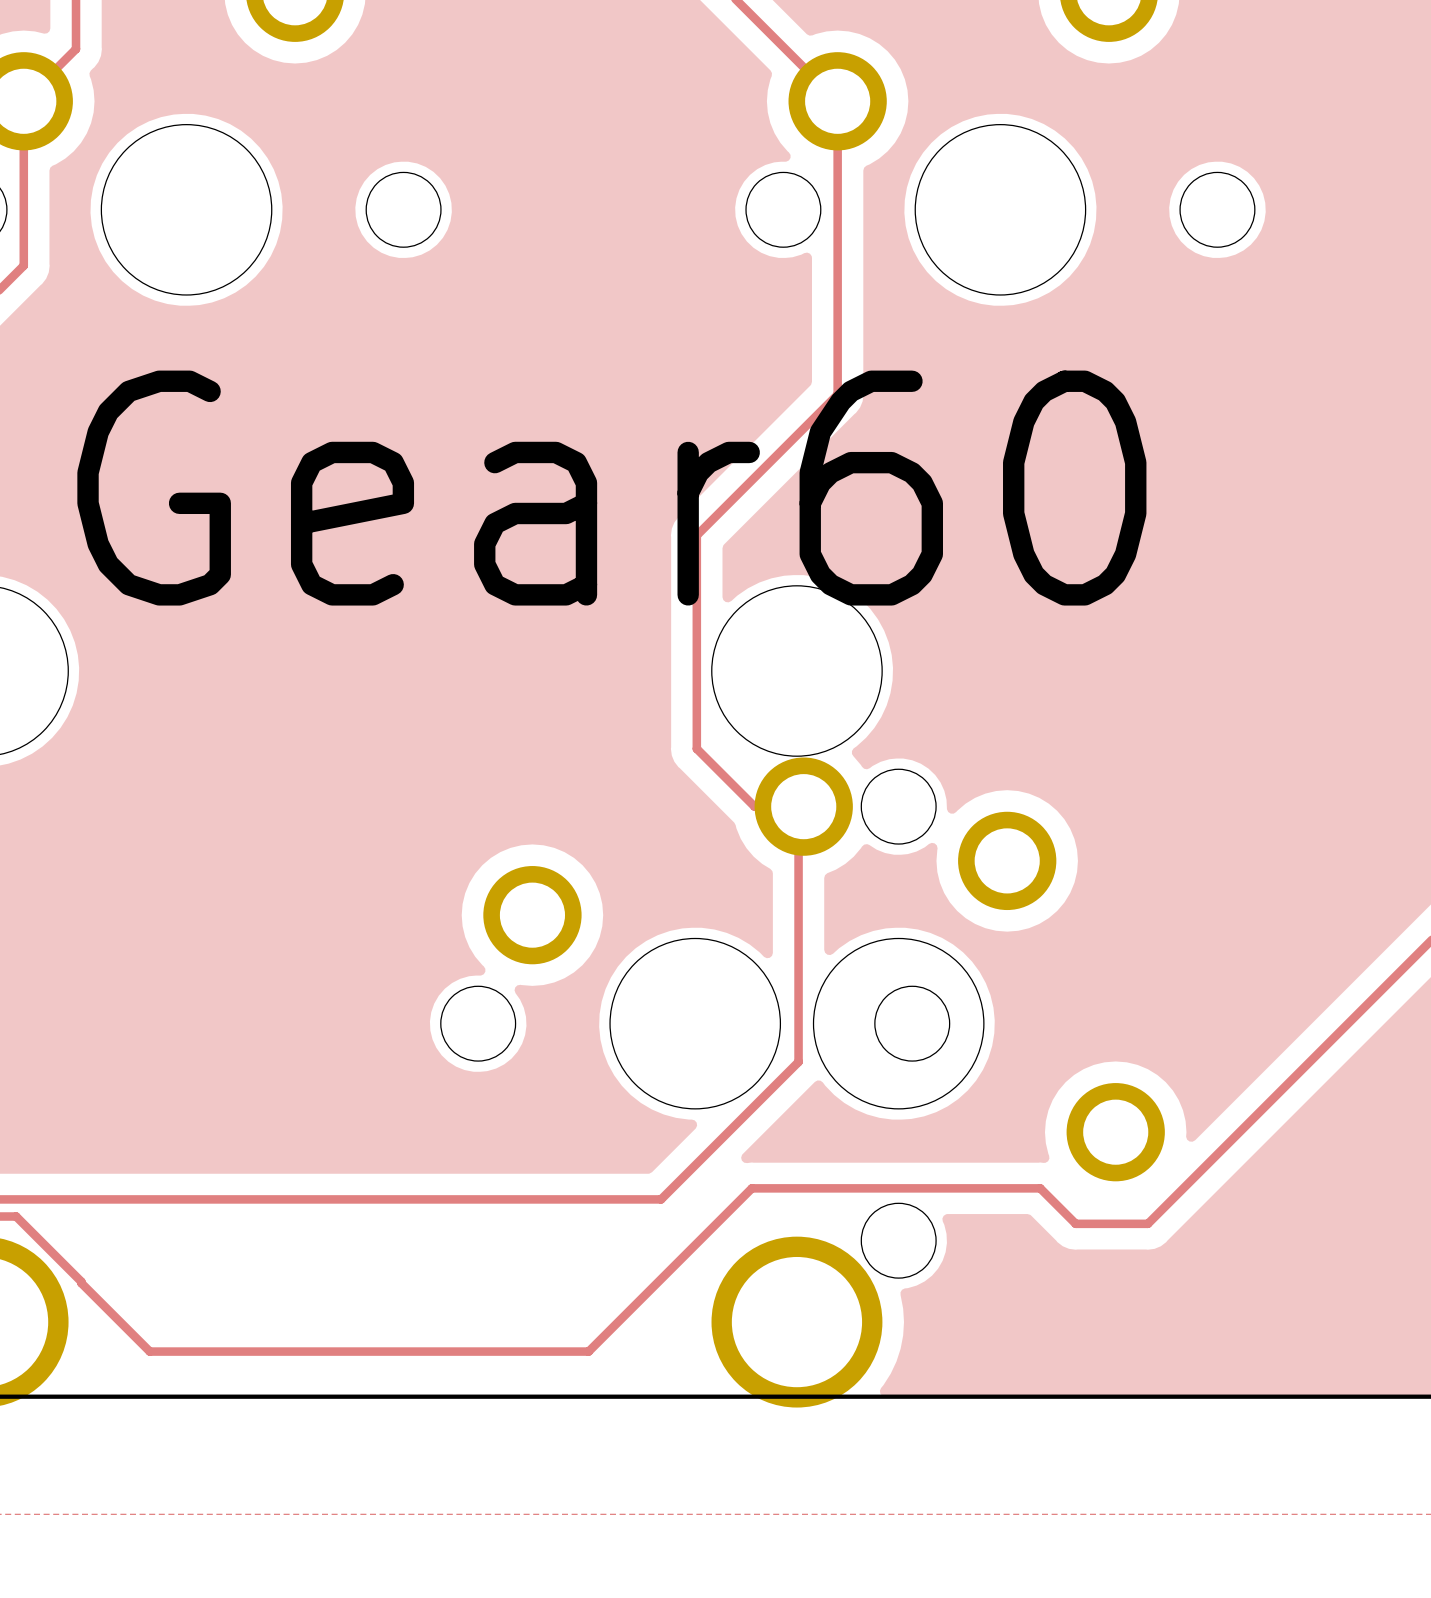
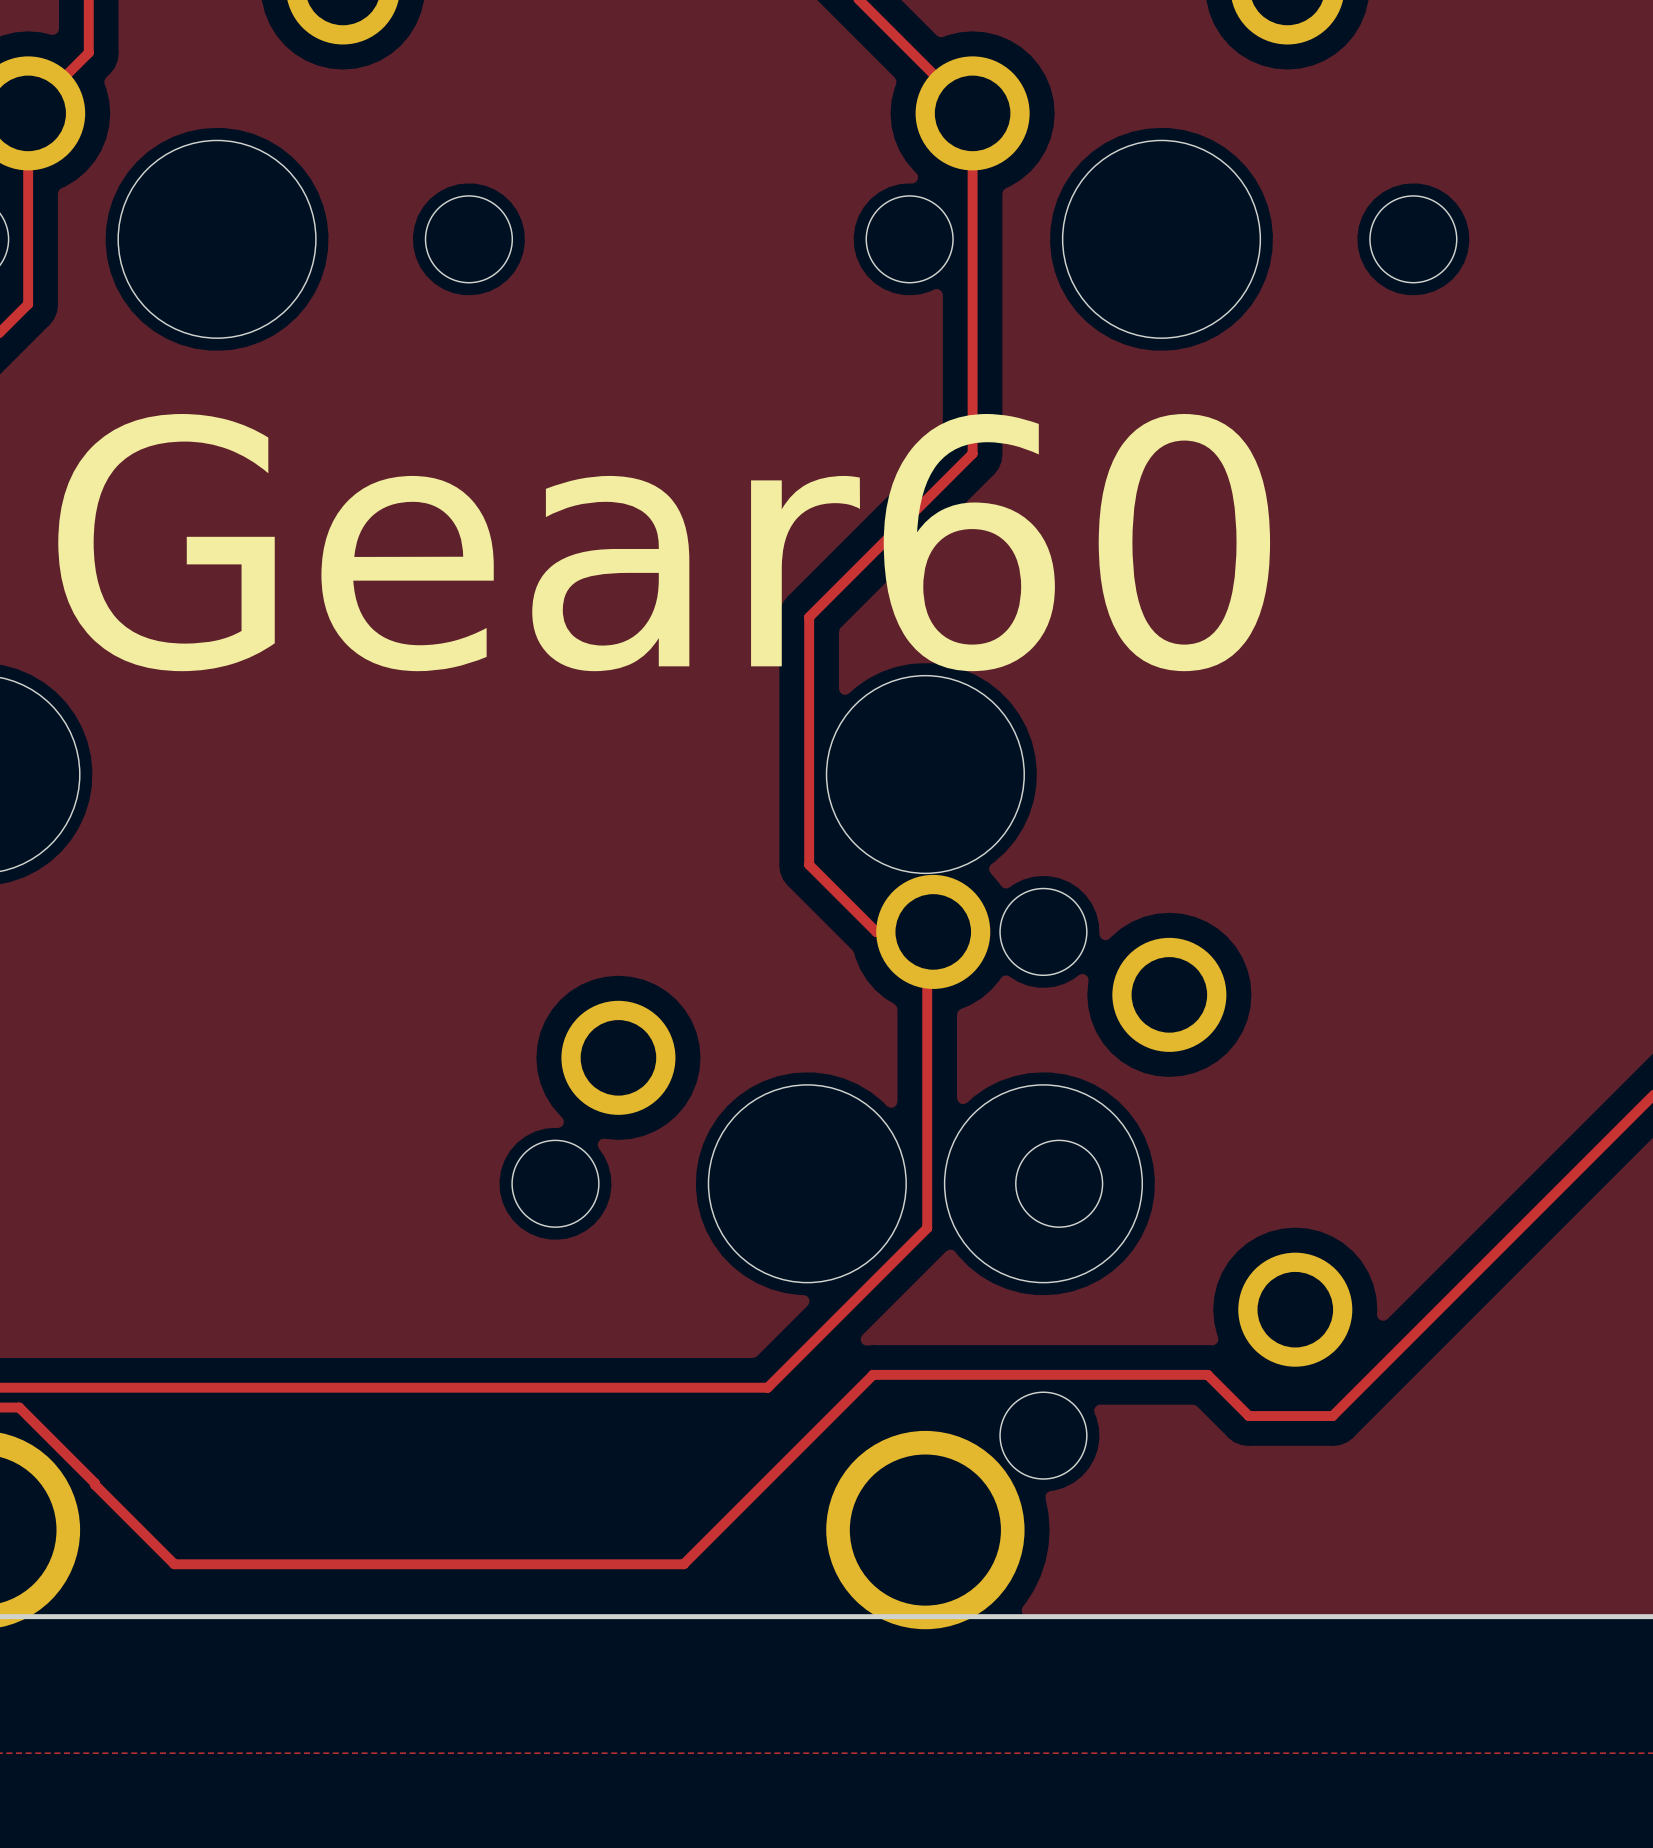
text position: Gear60 (611, 488) -> Gear60 (664, 542)

